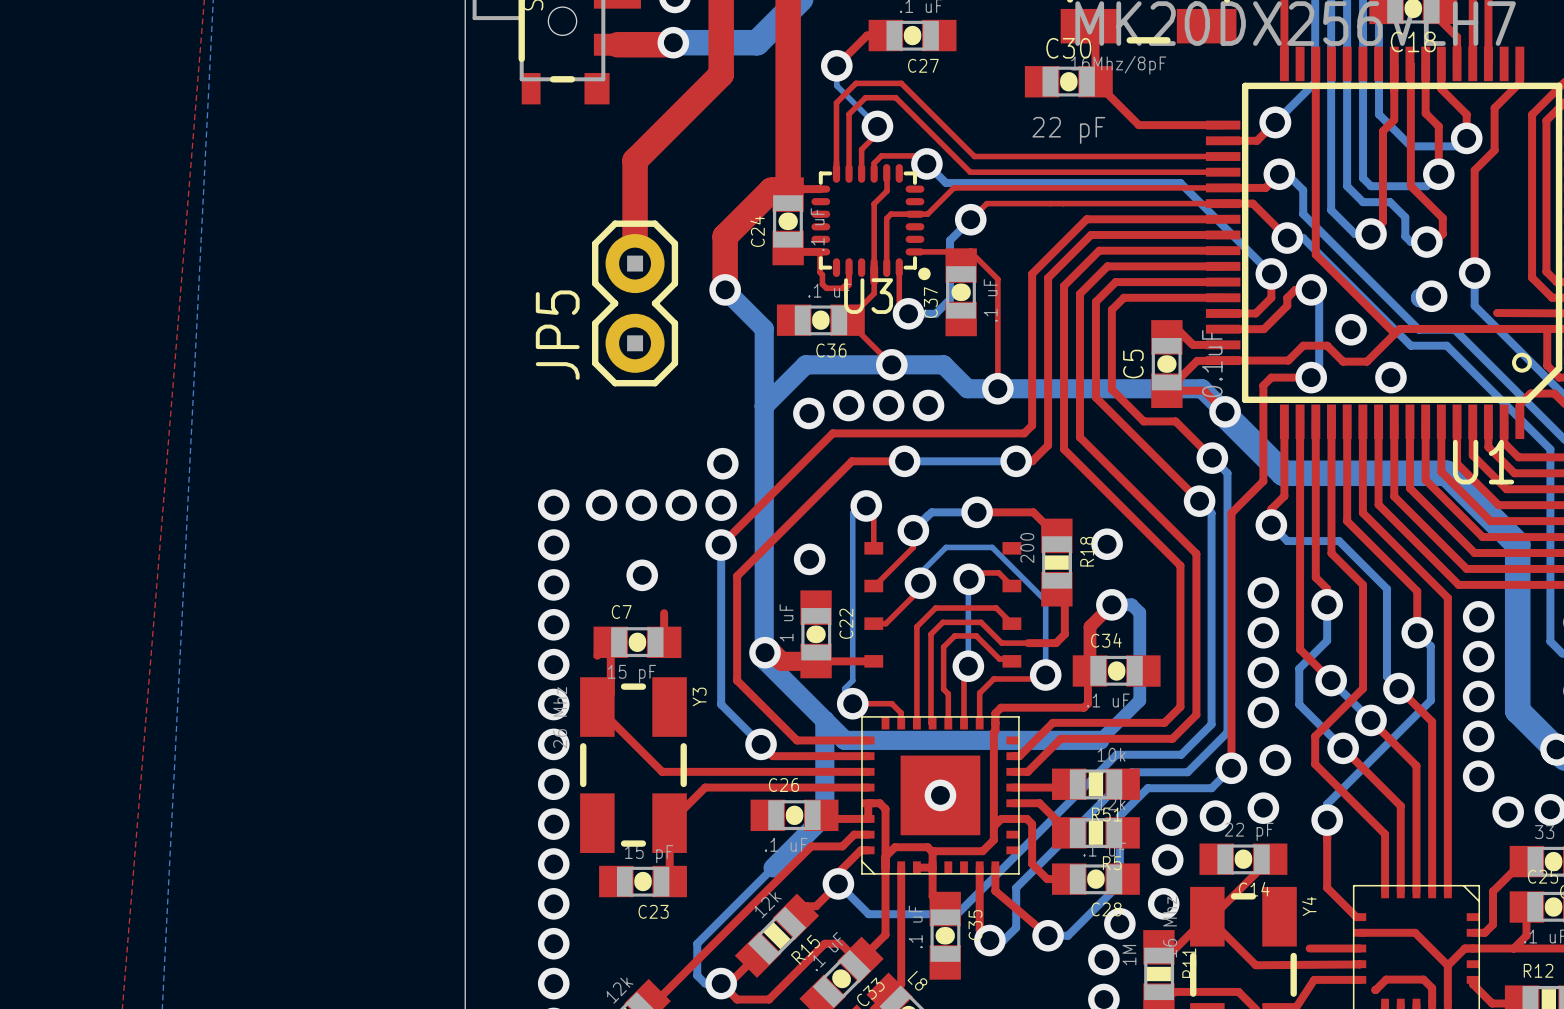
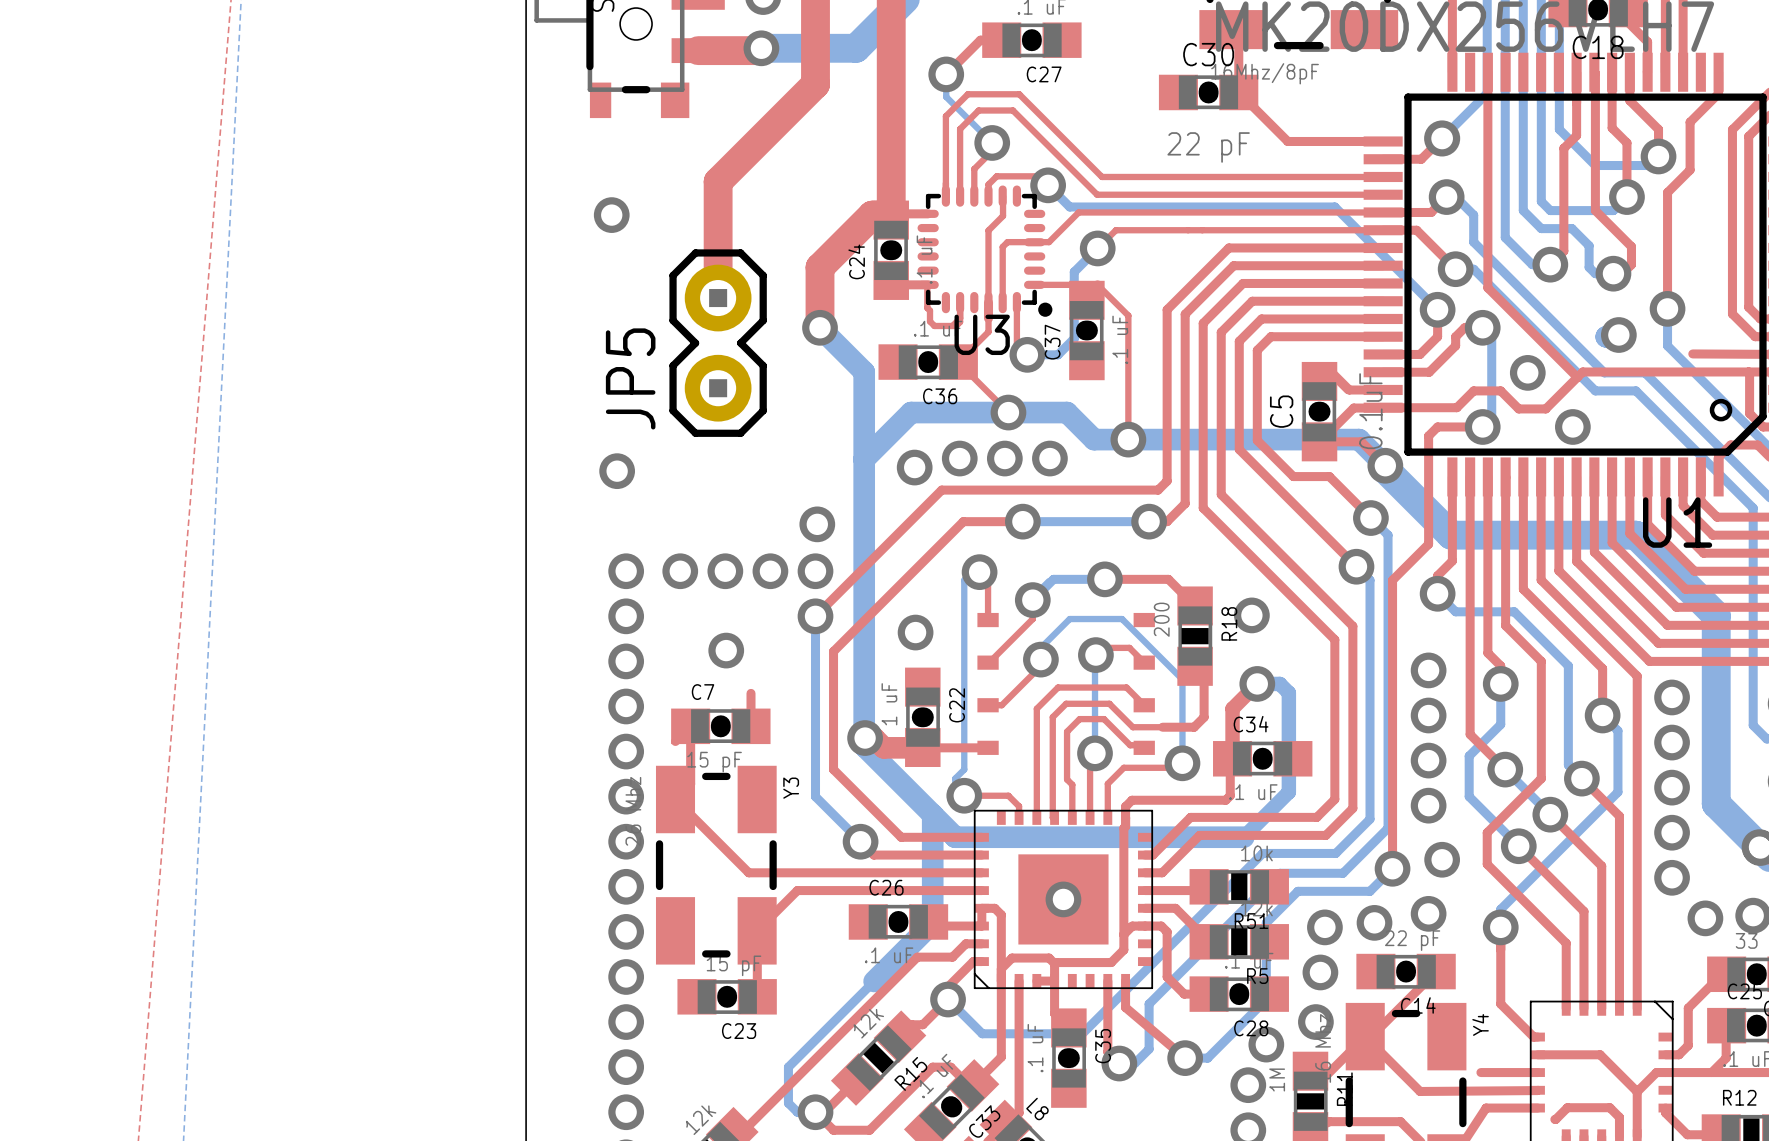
via: none -> (611, 215)
via: none -> (617, 471)

